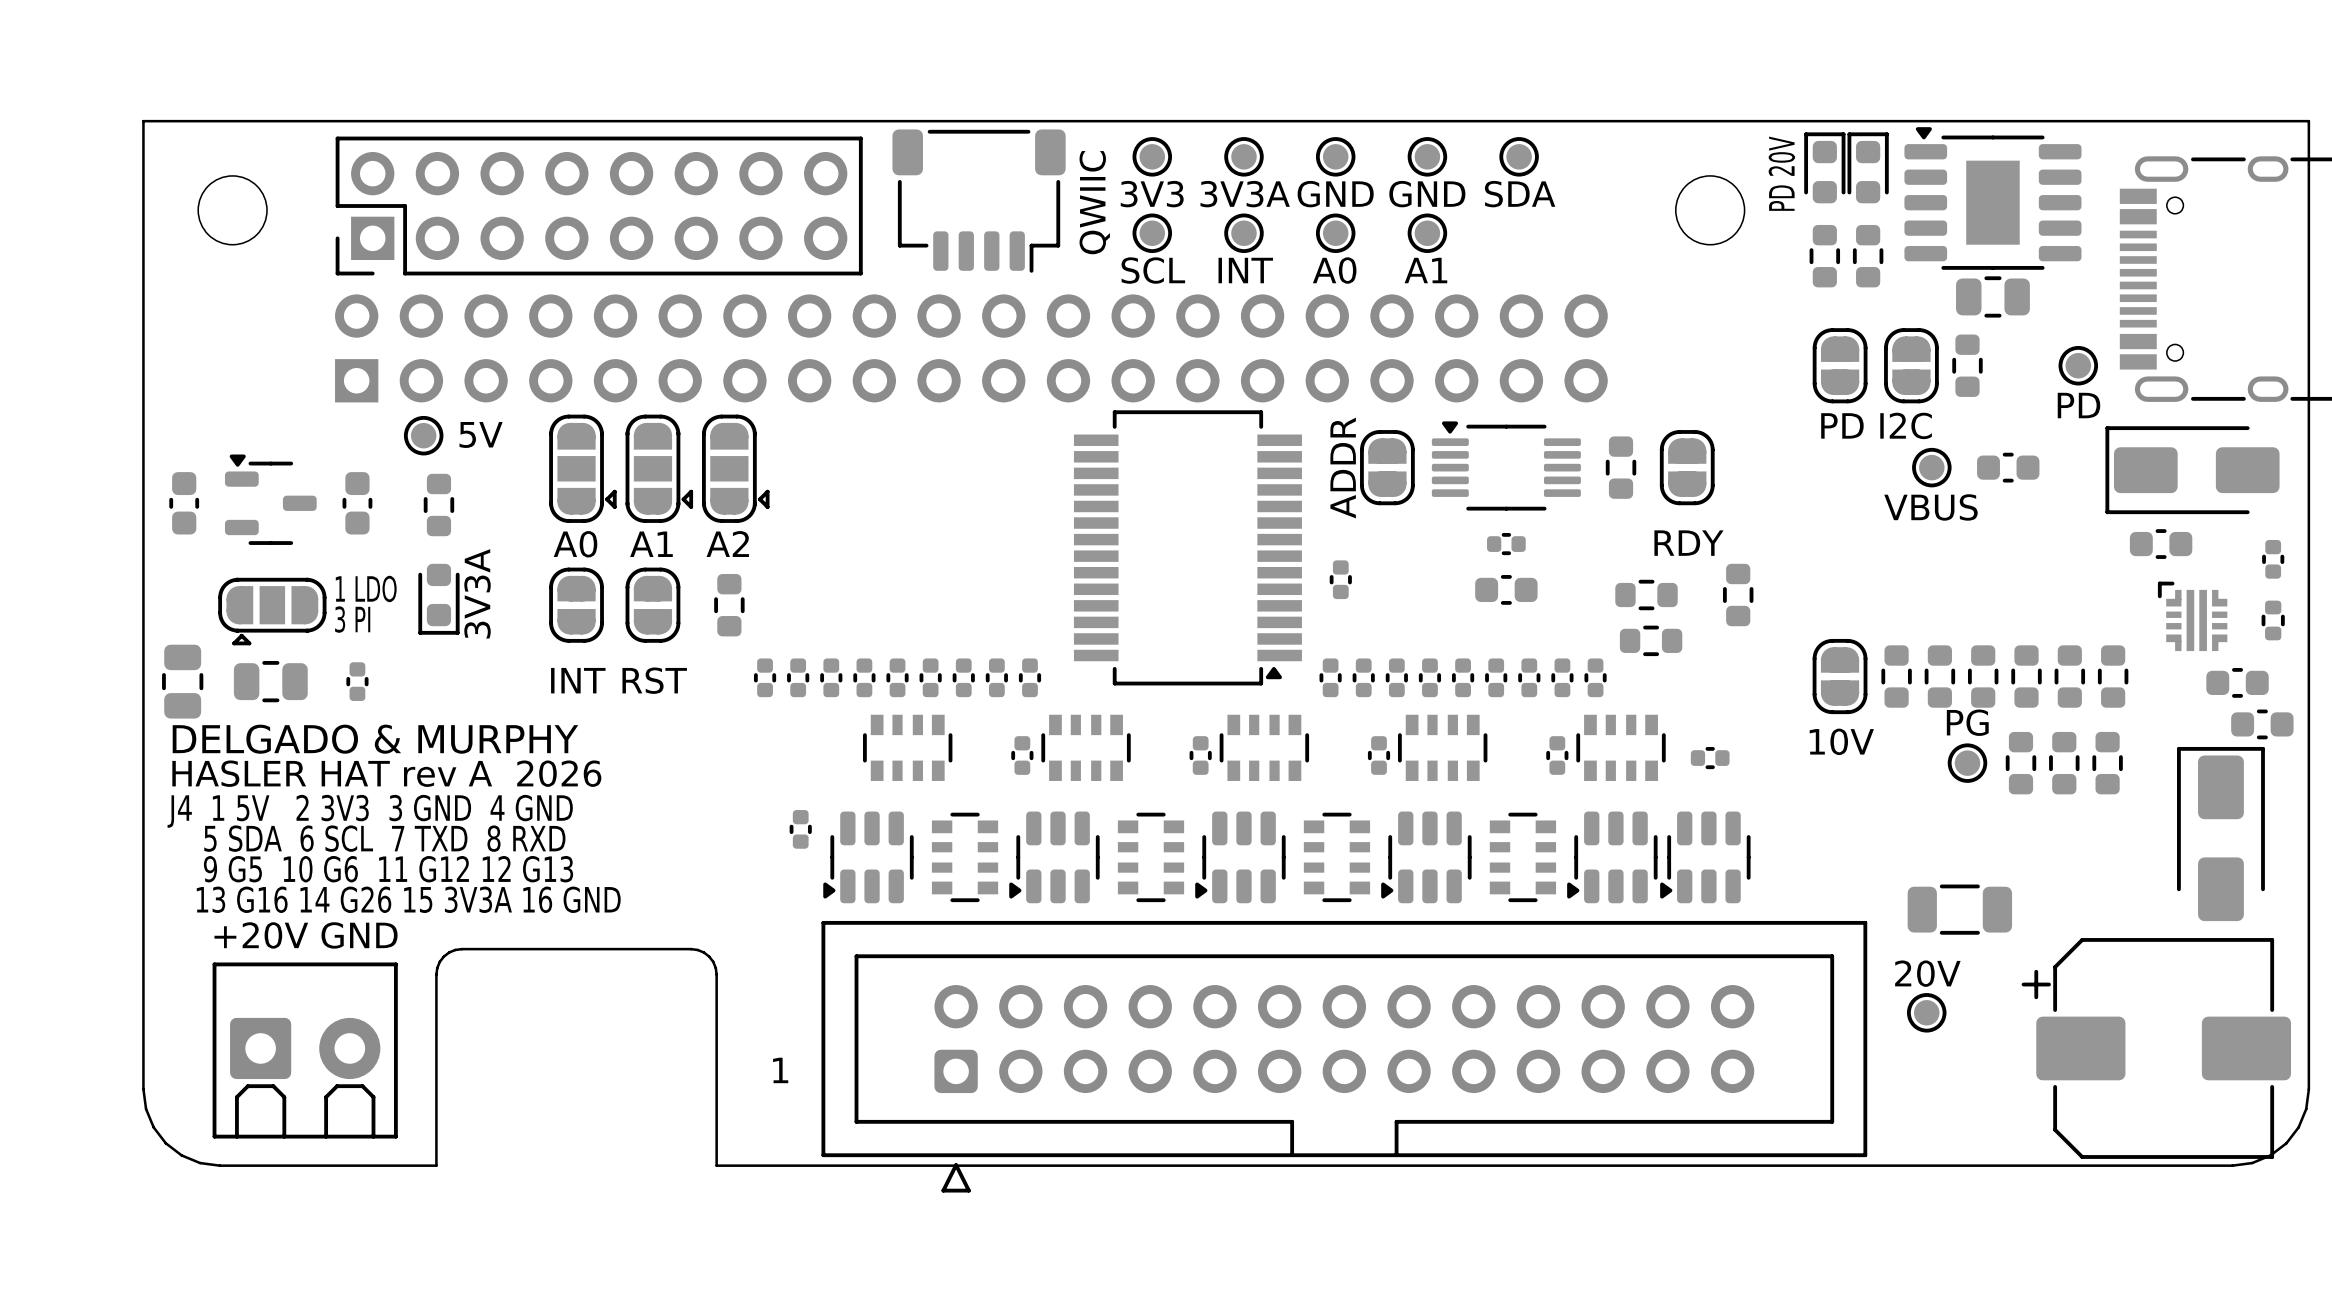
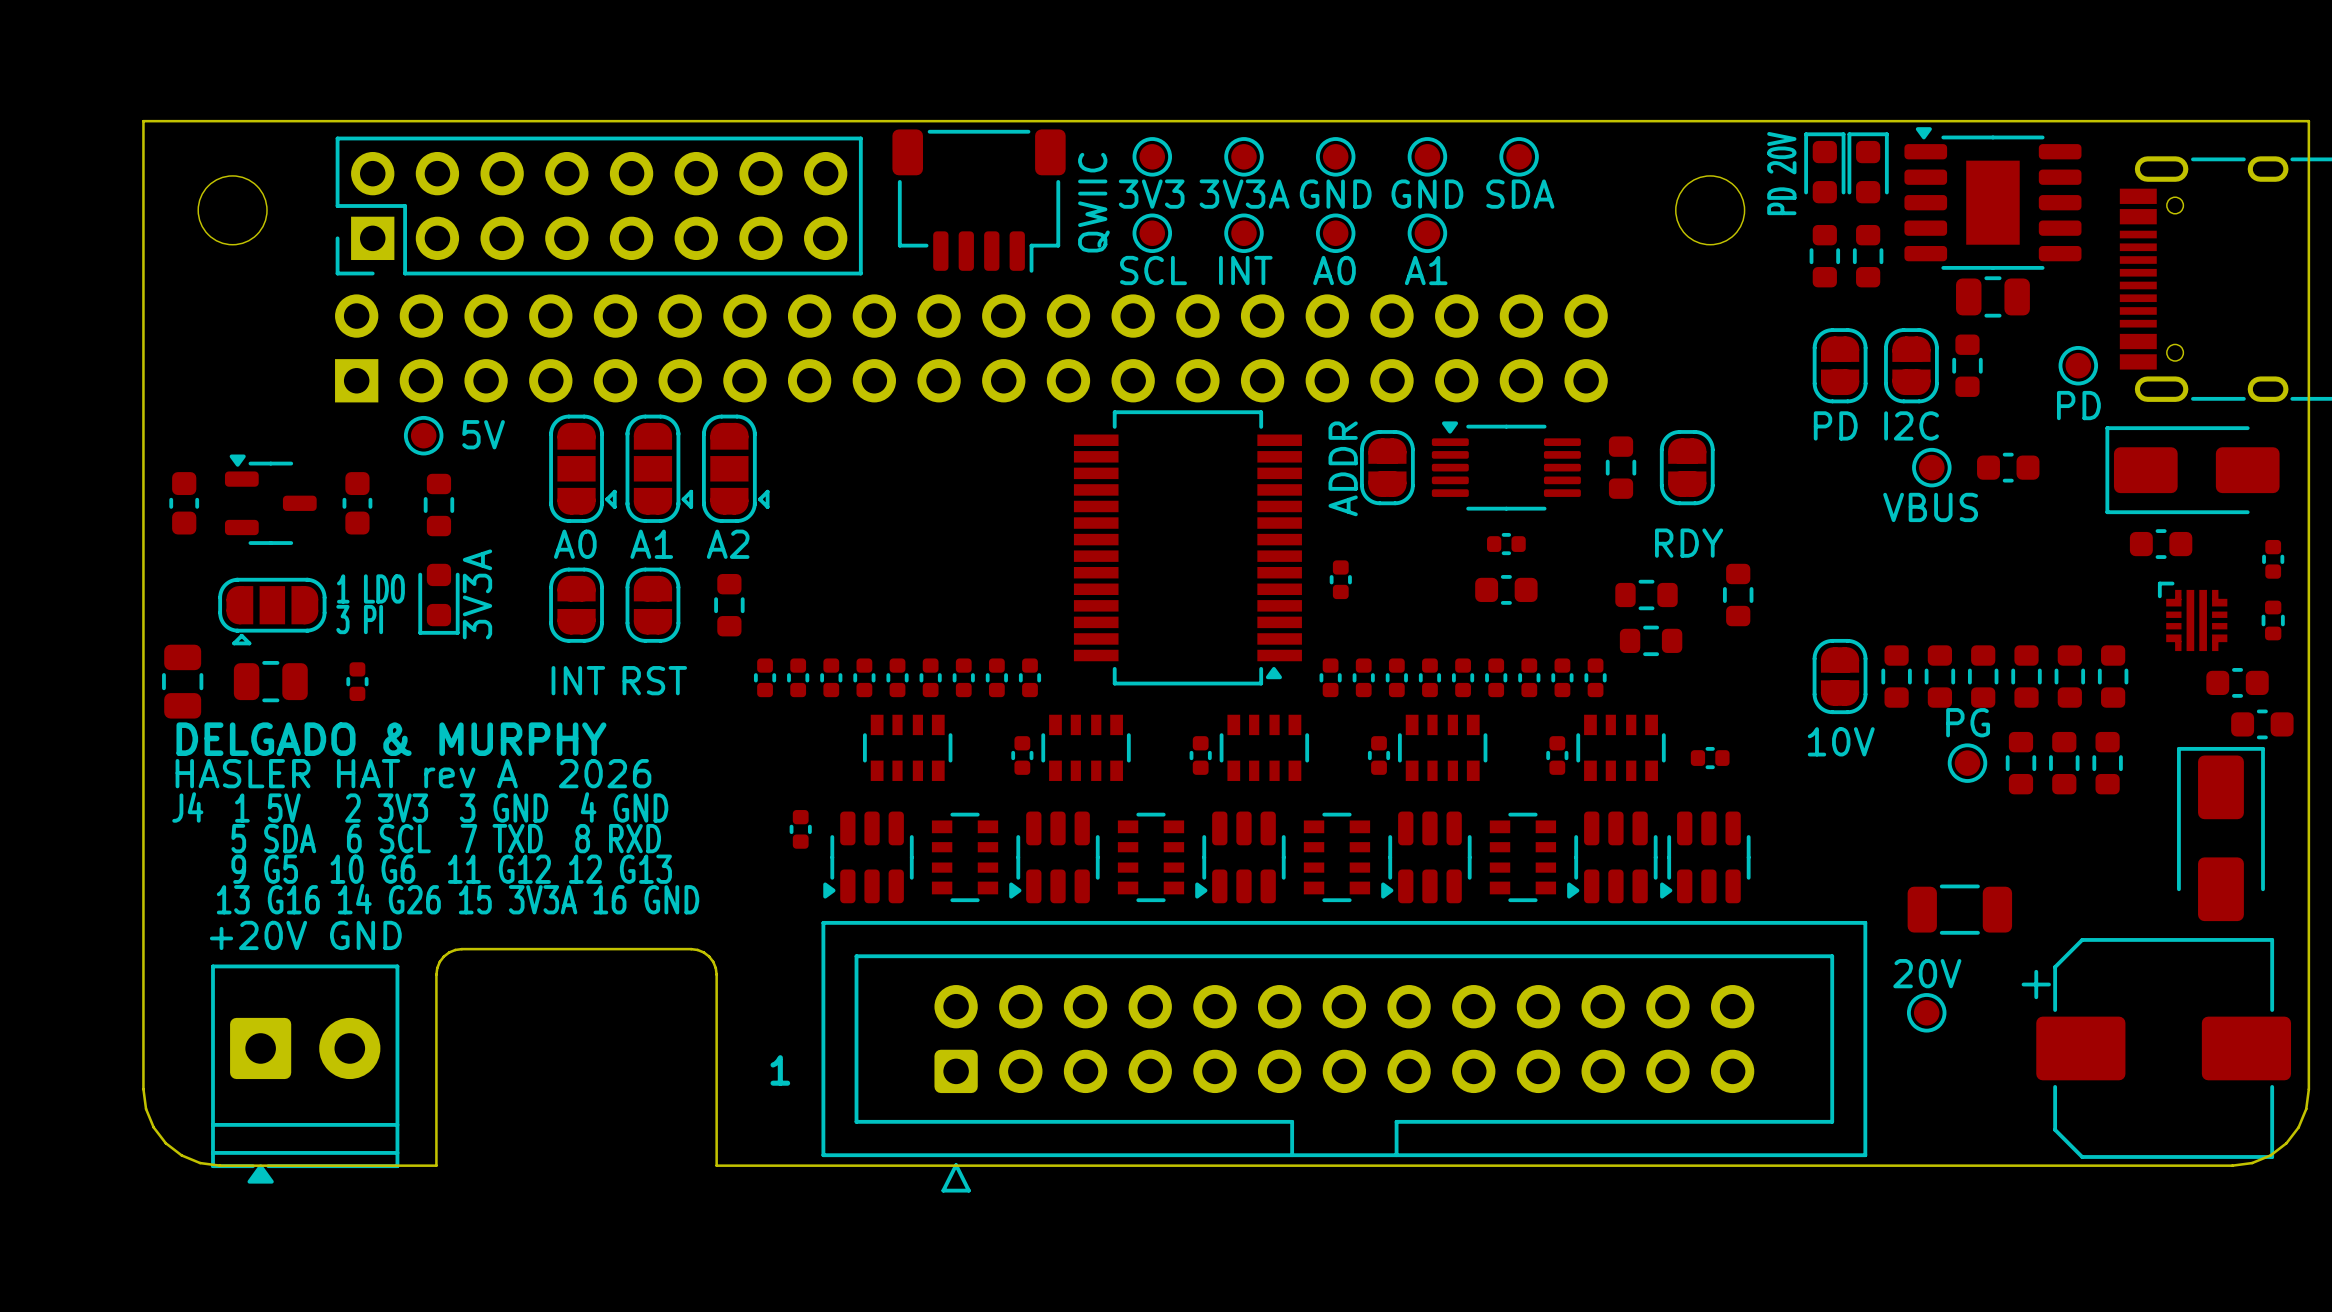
part footprint: [212, 962, 398, 1139] -> [211, 964, 400, 1184]

